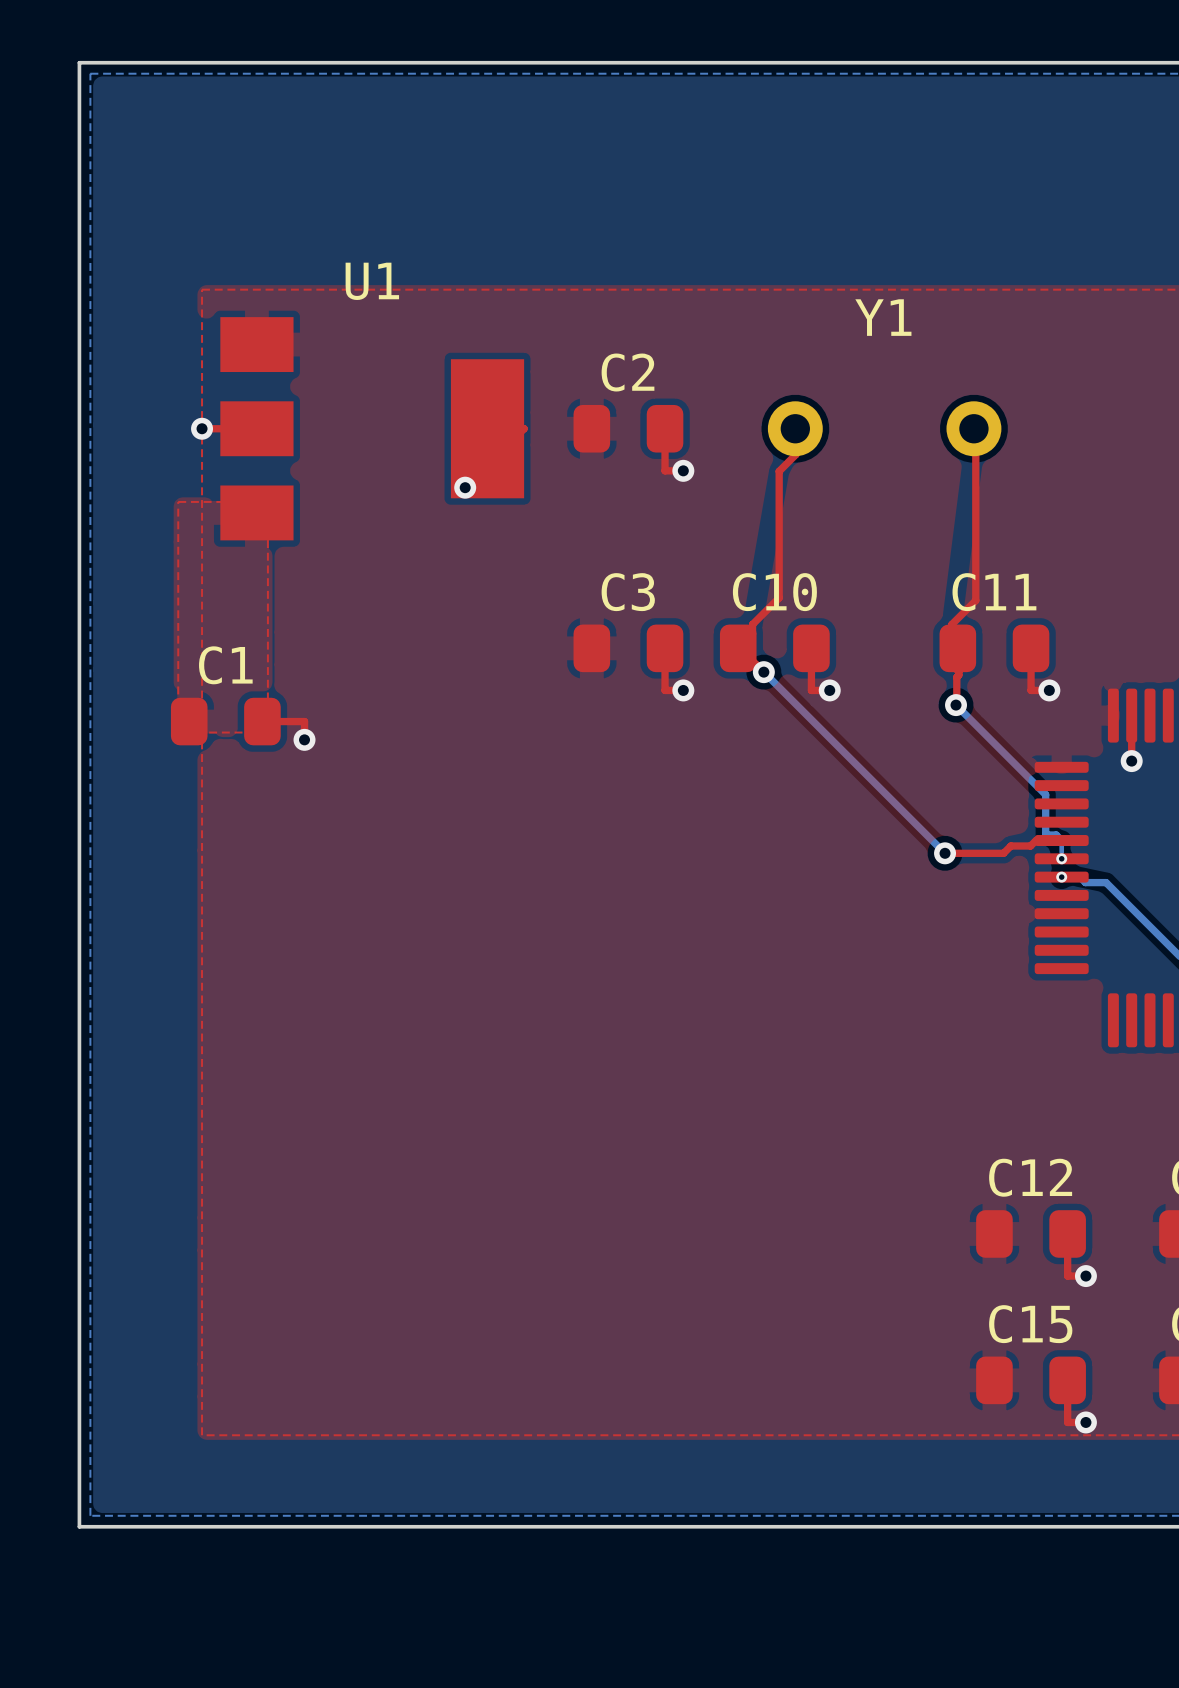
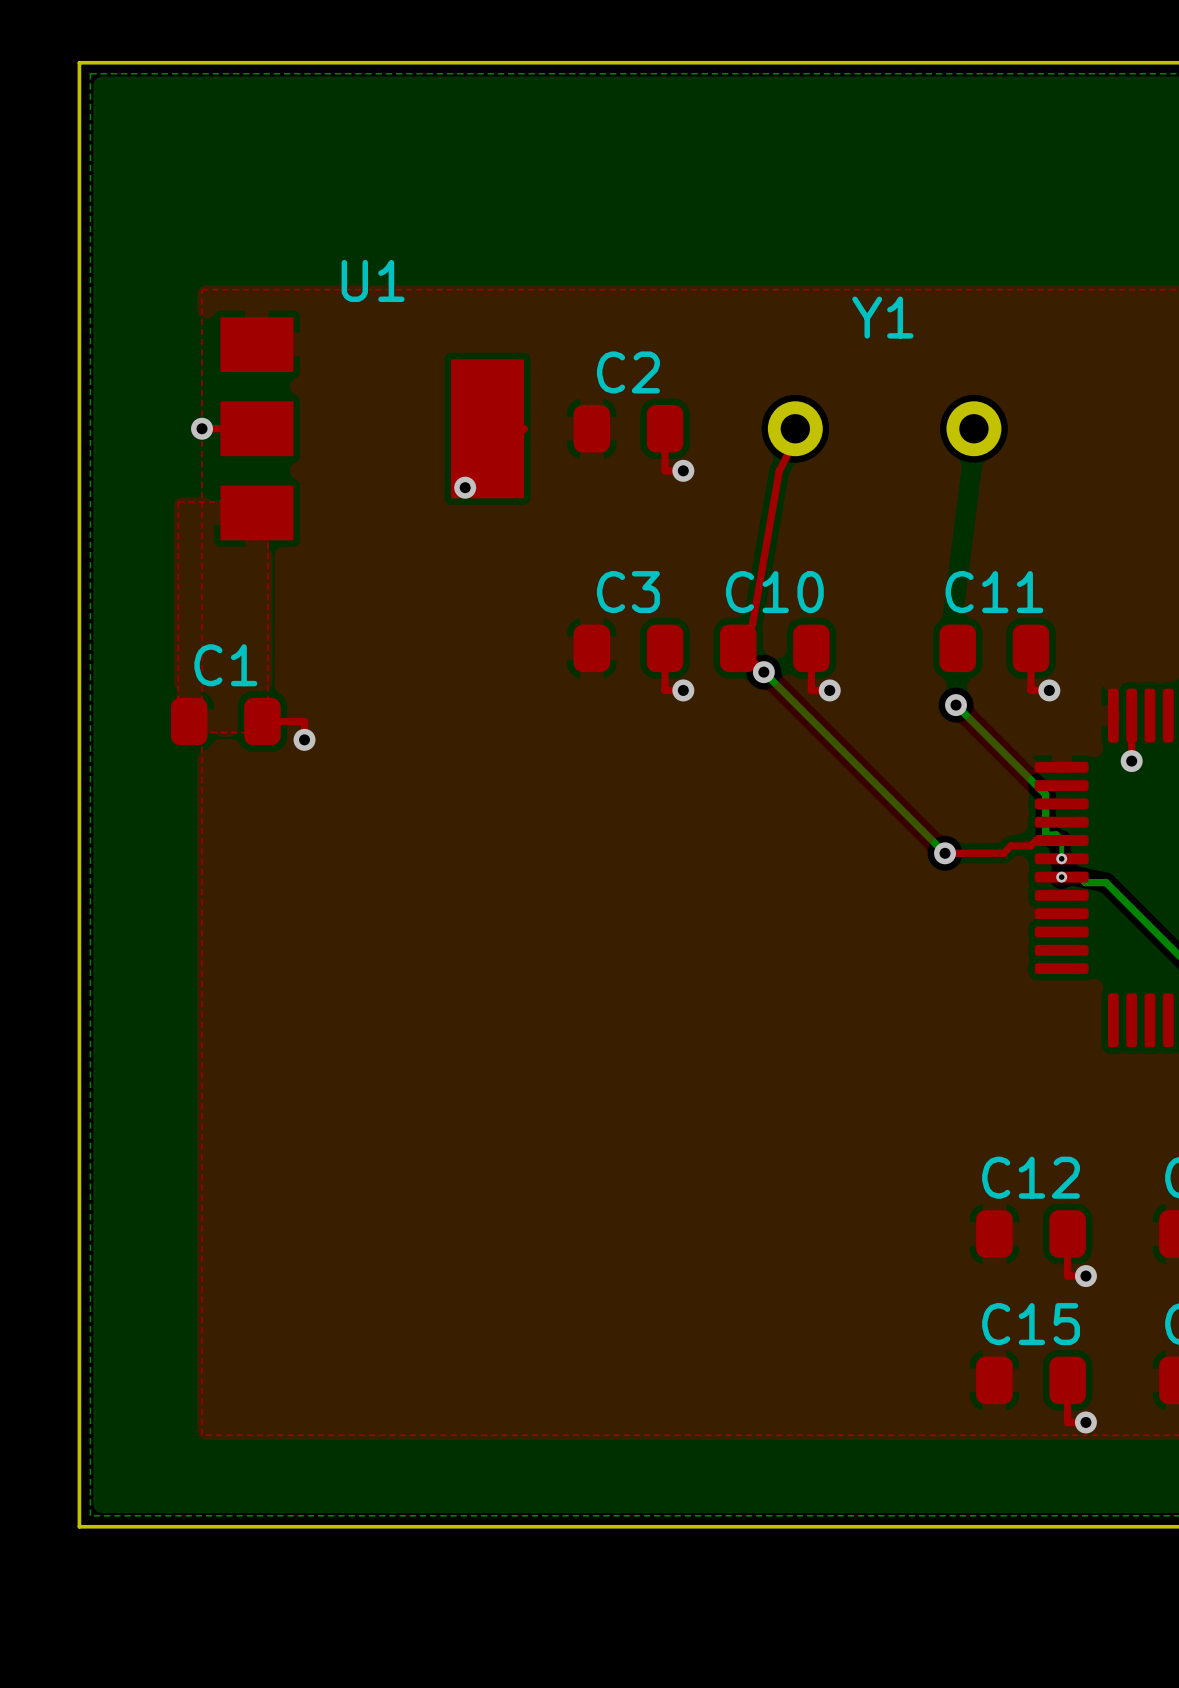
top track: (795, 428) (795, 454) (779, 471) (779, 597) (752, 624) (752, 634) (738, 648) (756, 664) -> (795, 428) (795, 438) (779, 471) (752, 624) (738, 648) (756, 664)
top track: (970, 431) (975, 436) (975, 600) (951, 624) (951, 642) (957, 648) (957, 703) -> none

